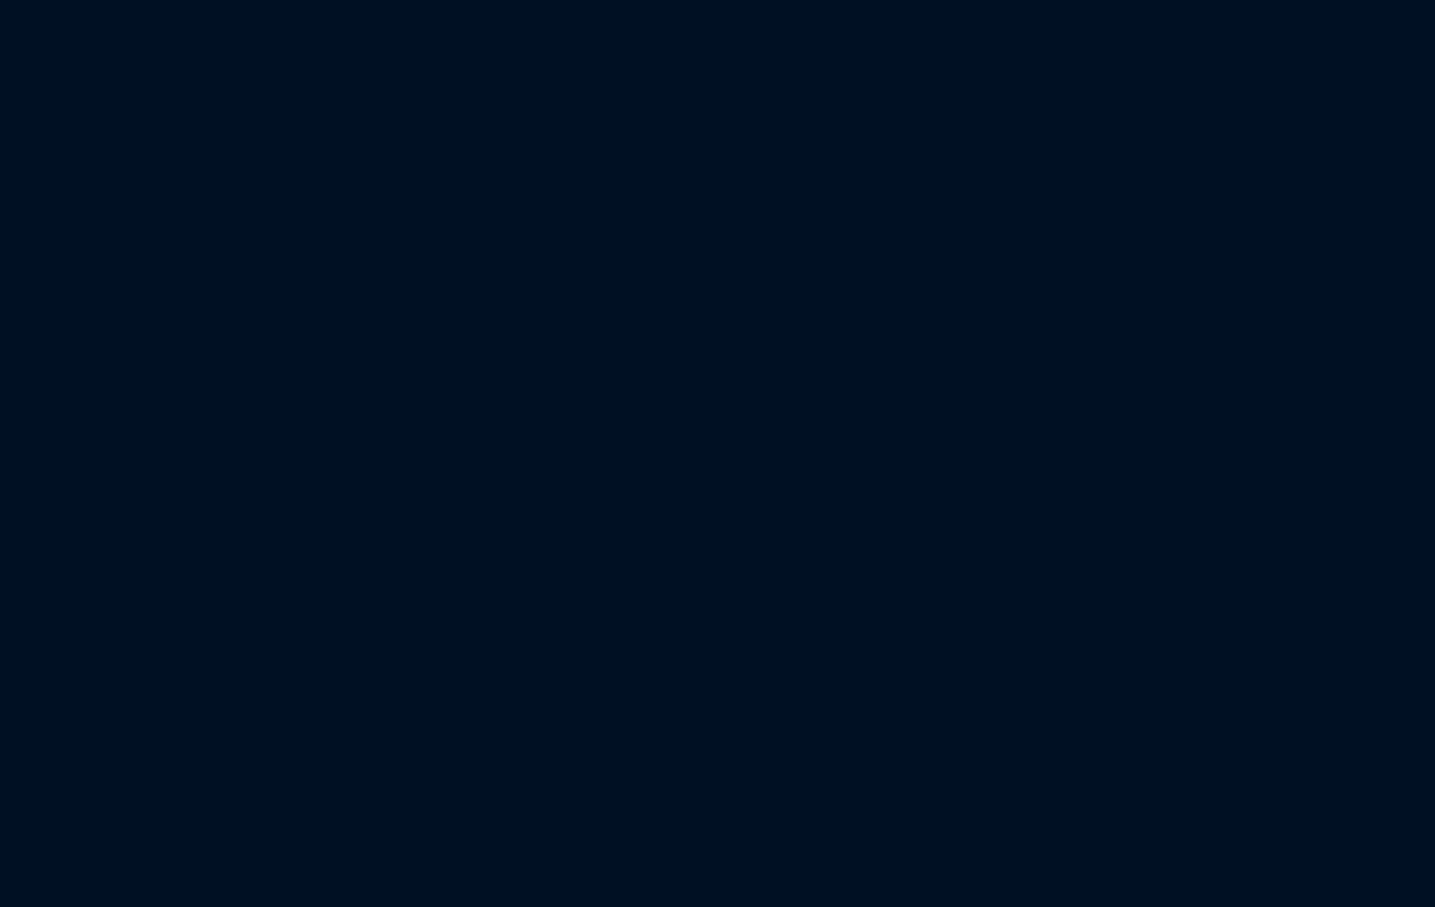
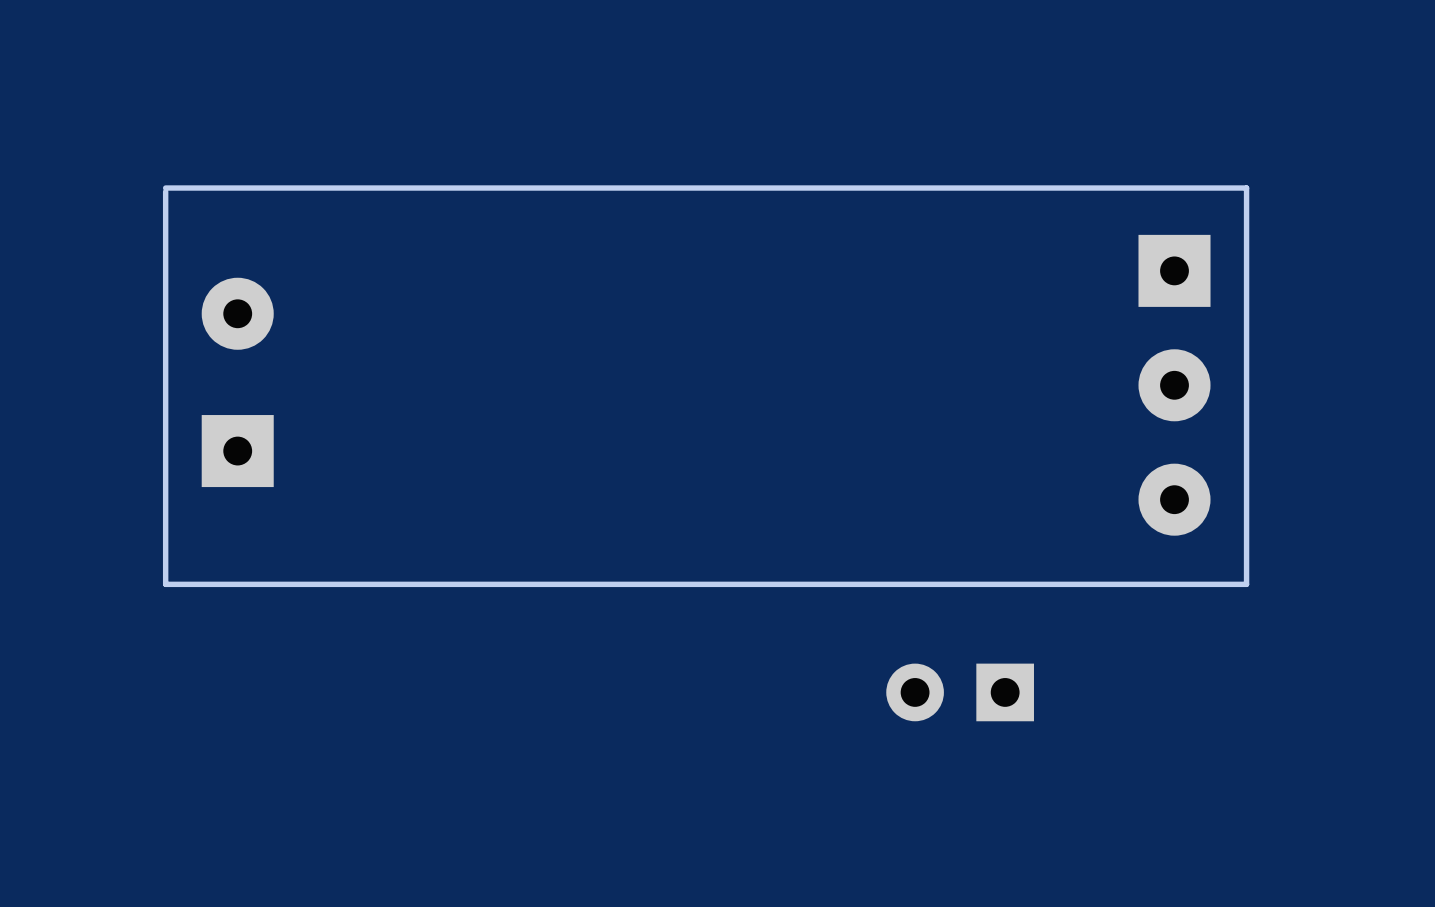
board edge: none -> (165, 188) (1246, 188) (1246, 584) (165, 584) (165, 191)
part: none -> (237, 382)
part: none -> (1174, 385)
part: none -> (960, 692)

